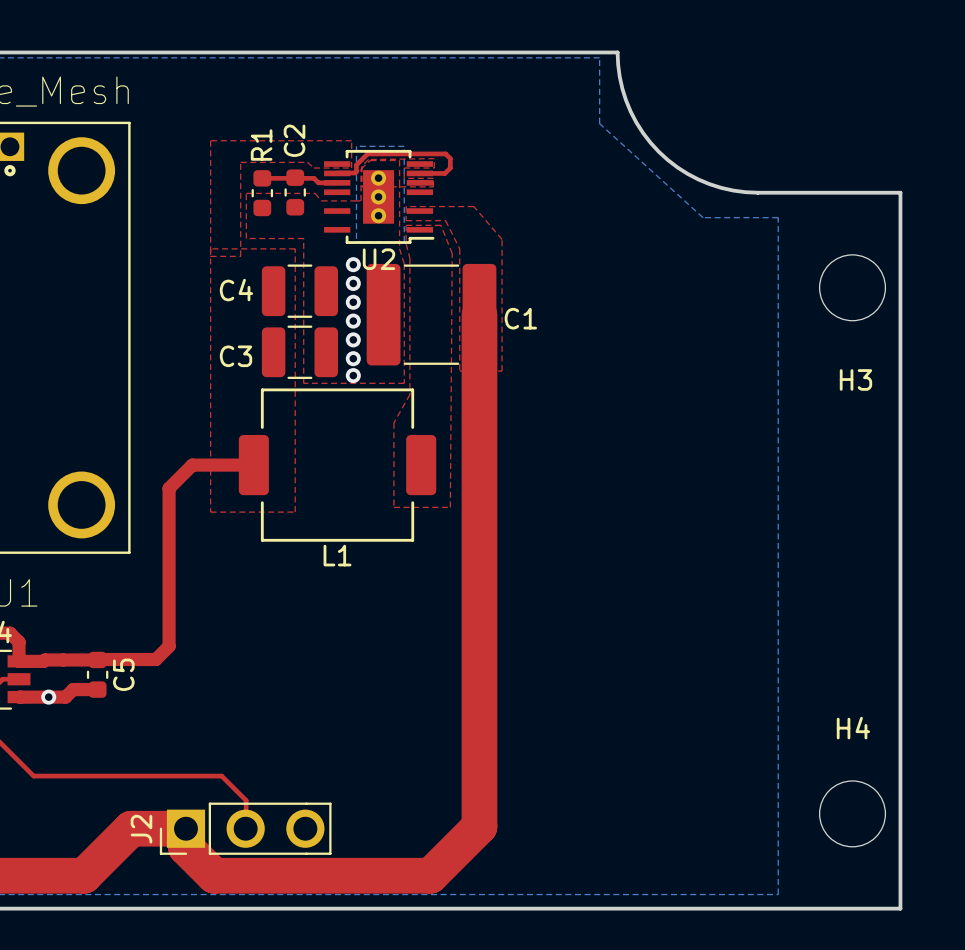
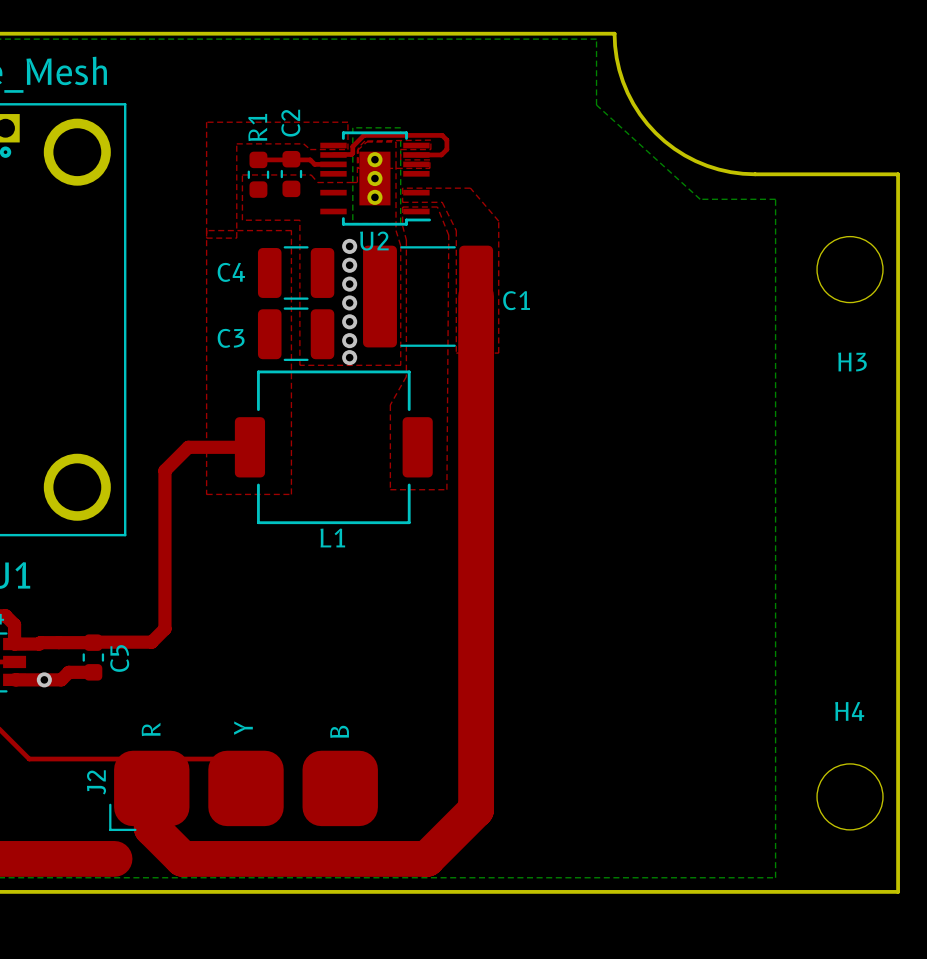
J2 footprint: [159, 802, 332, 855] -> [109, 750, 378, 832]
top track: none -> (151, 788) (151, 828) (182, 858) (210, 858)
J2 name position: J2 (141, 829) -> J2 (96, 782)
top track: (84, 875) (131, 828) (185, 828) (185, 847) (214, 875) -> (79, 858) (114, 858)

